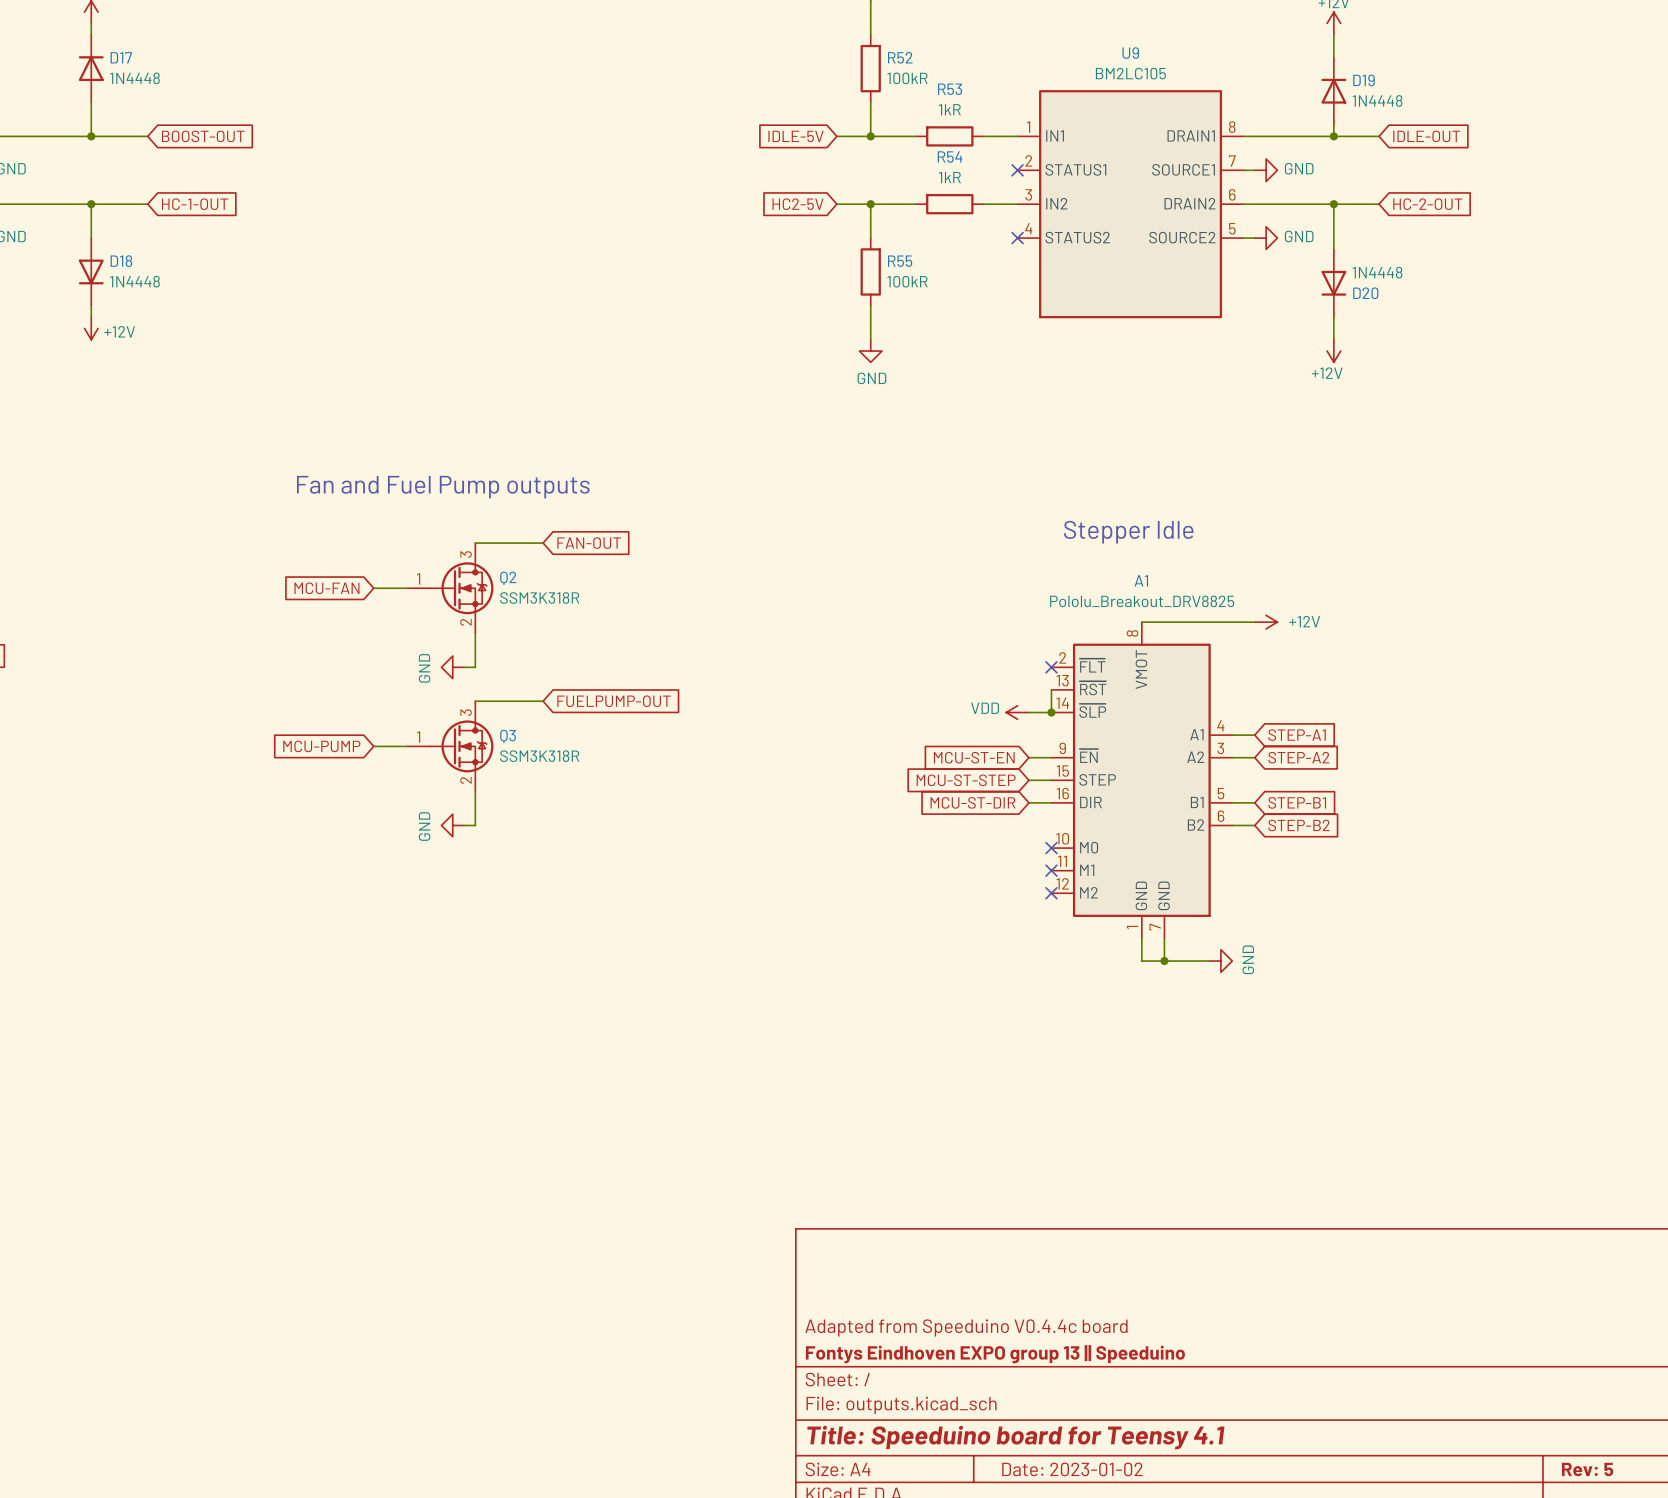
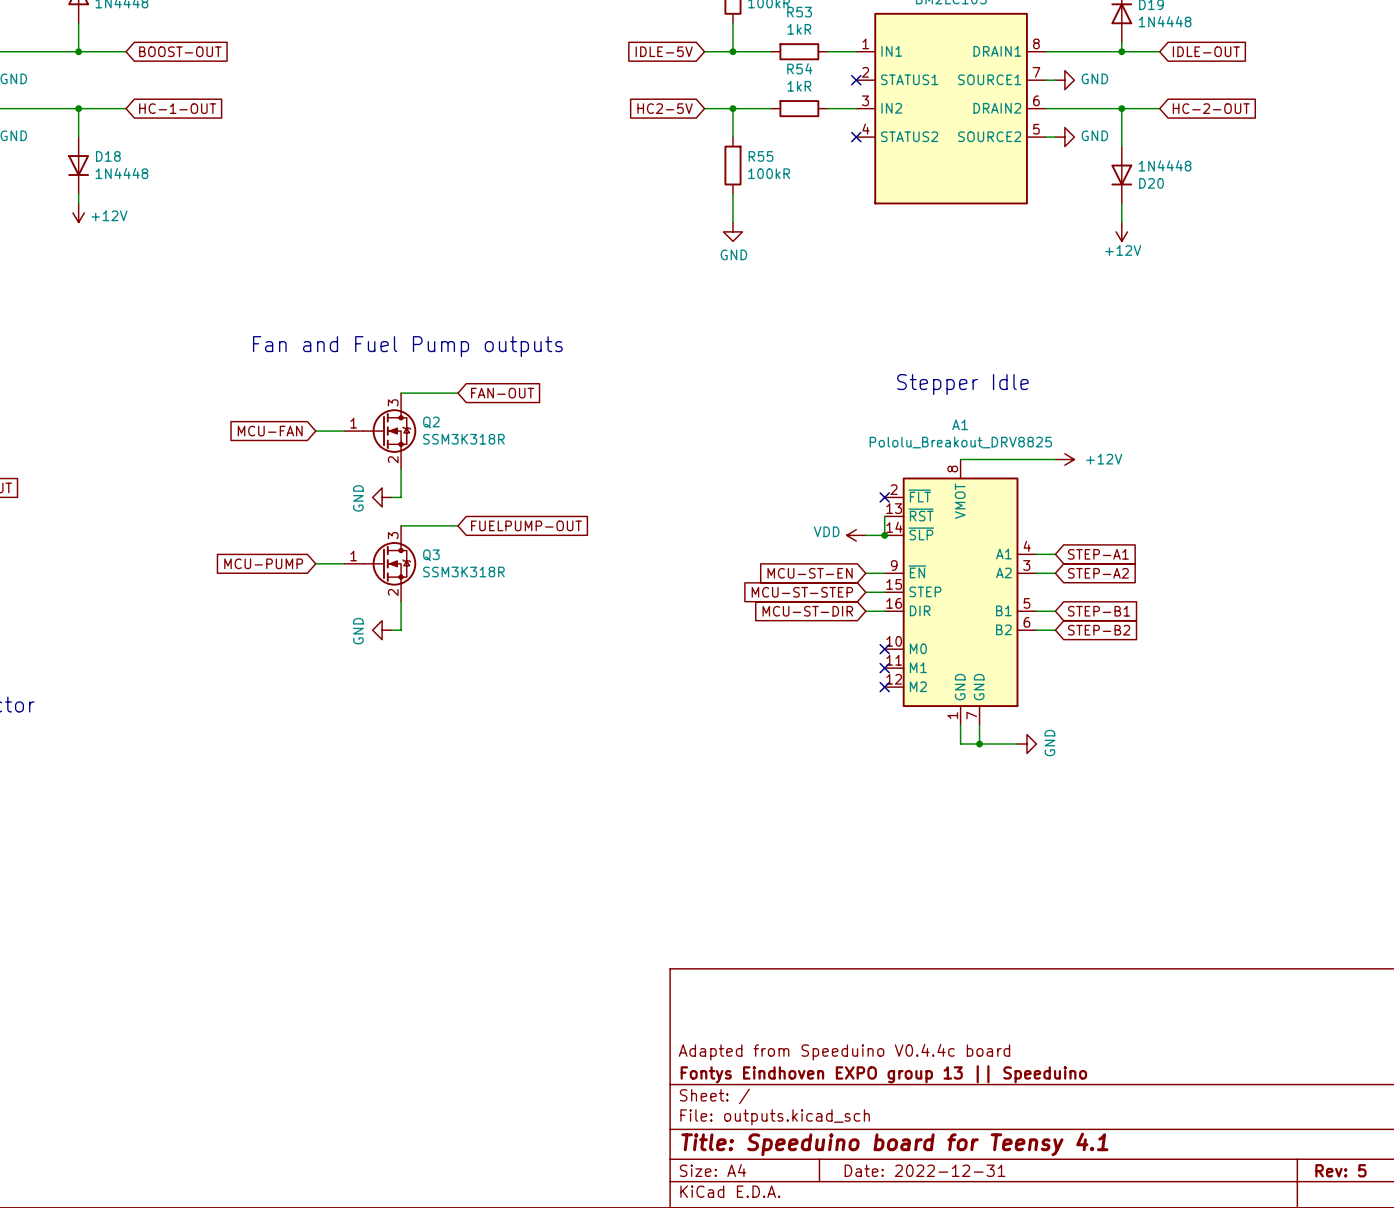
title block: Date: 2023-01-02 (1072, 1469) -> Date: 2022-12-31 (925, 1170)

